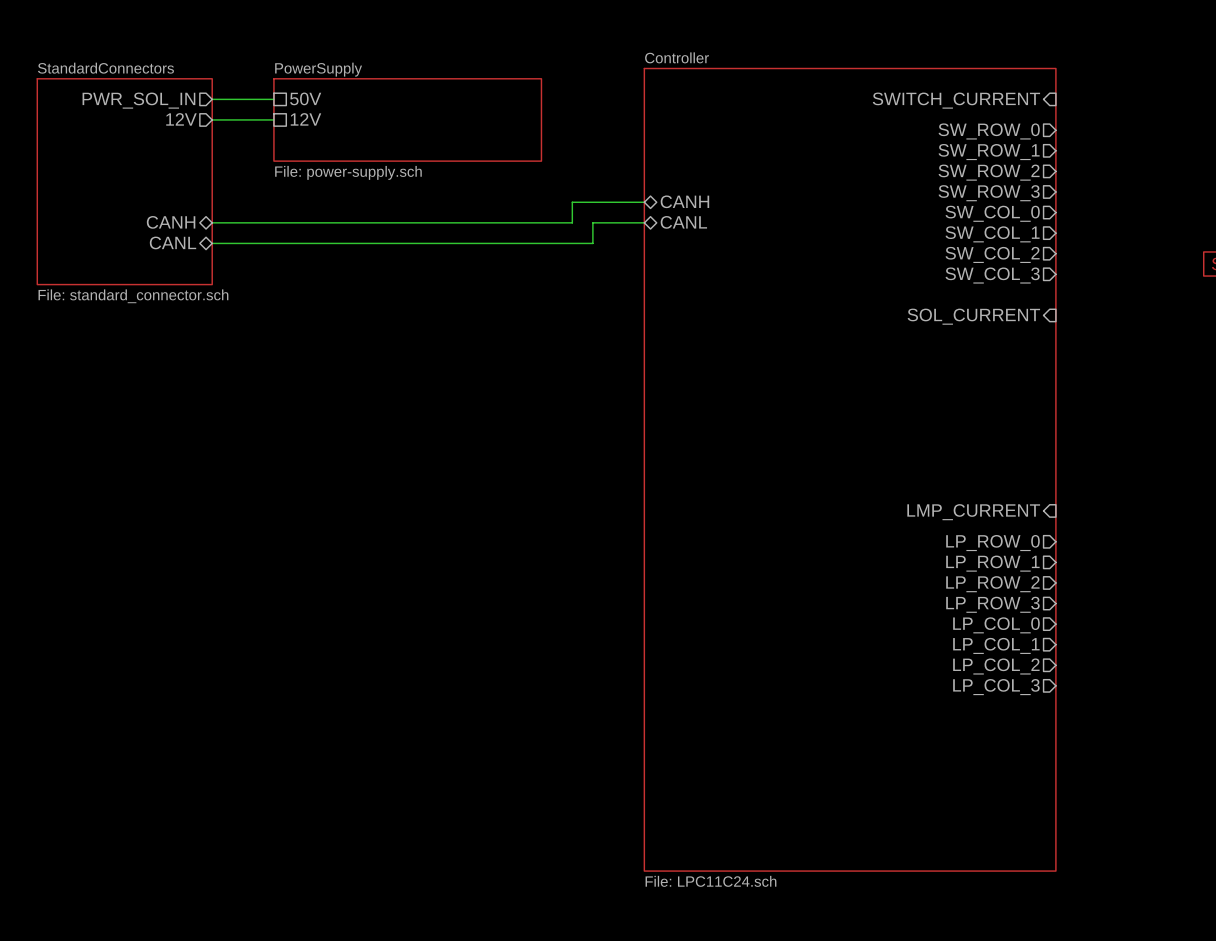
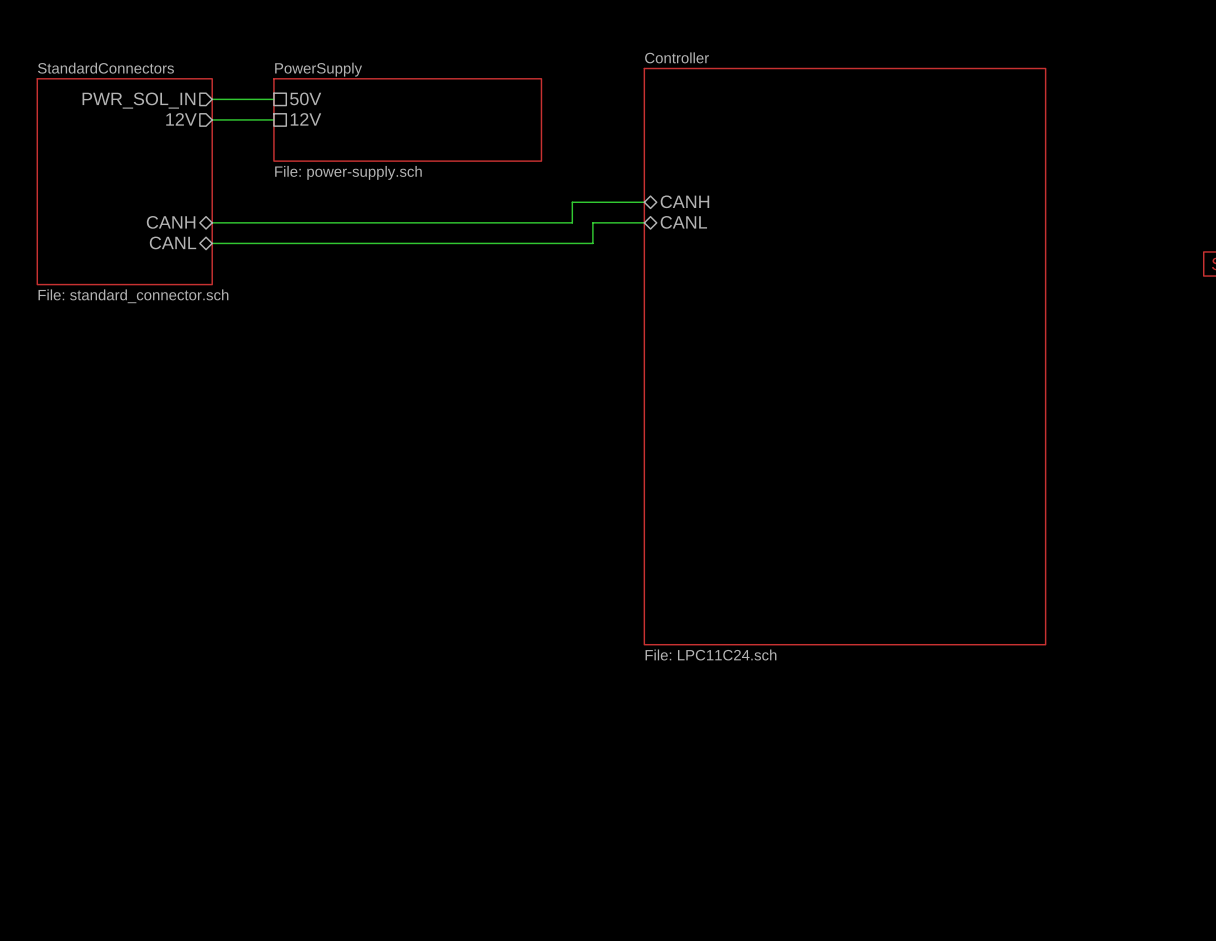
sheet pin: SWITCH_CURRENT (956, 100) -> none
sheet pin: SW_ROW_0 (989, 131) -> none
sheet pin: SW_ROW_1 (989, 152) -> none
sheet pin: SW_ROW_2 (989, 172) -> none
sheet pin: SW_ROW_3 (989, 193) -> none
sheet pin: SW_COL_0 (992, 213) -> none
sheet pin: SW_COL_1 (992, 234) -> none
sheet pin: SW_COL_2 (992, 254) -> none
sheet pin: SW_COL_3 (992, 275) -> none
sheet pin: SOL_CURRENT (973, 316) -> none
sheet Controller: none -> File: LPC11C24.sch (844, 356)
sheet Controller: File: LPC11C24.sch (850, 469) -> none
sheet pin: LMP_CURRENT (973, 512) -> none
sheet pin: LP_ROW_0 (992, 543) -> none
sheet pin: LP_ROW_1 (992, 563) -> none
sheet pin: LP_ROW_2 (992, 584) -> none
sheet pin: LP_ROW_3 (992, 604) -> none
sheet pin: LP_COL_0 (996, 625) -> none
sheet pin: LP_COL_1 (996, 645) -> none
sheet pin: LP_COL_2 (996, 666) -> none
sheet pin: LP_COL_3 (996, 687) -> none

